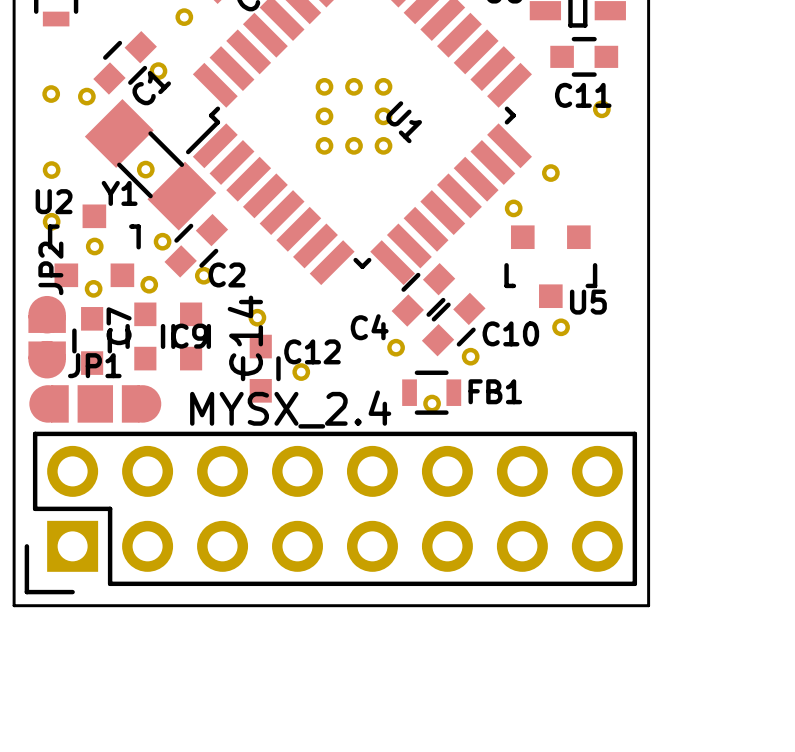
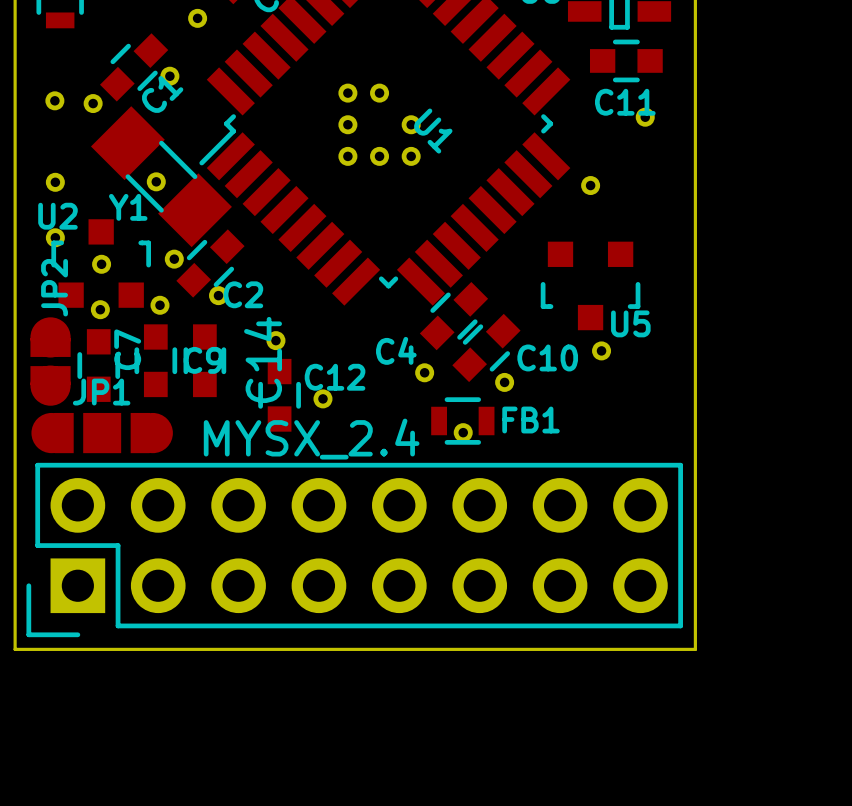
part: (383, 86) -> none
part: (513, 208) -> none

